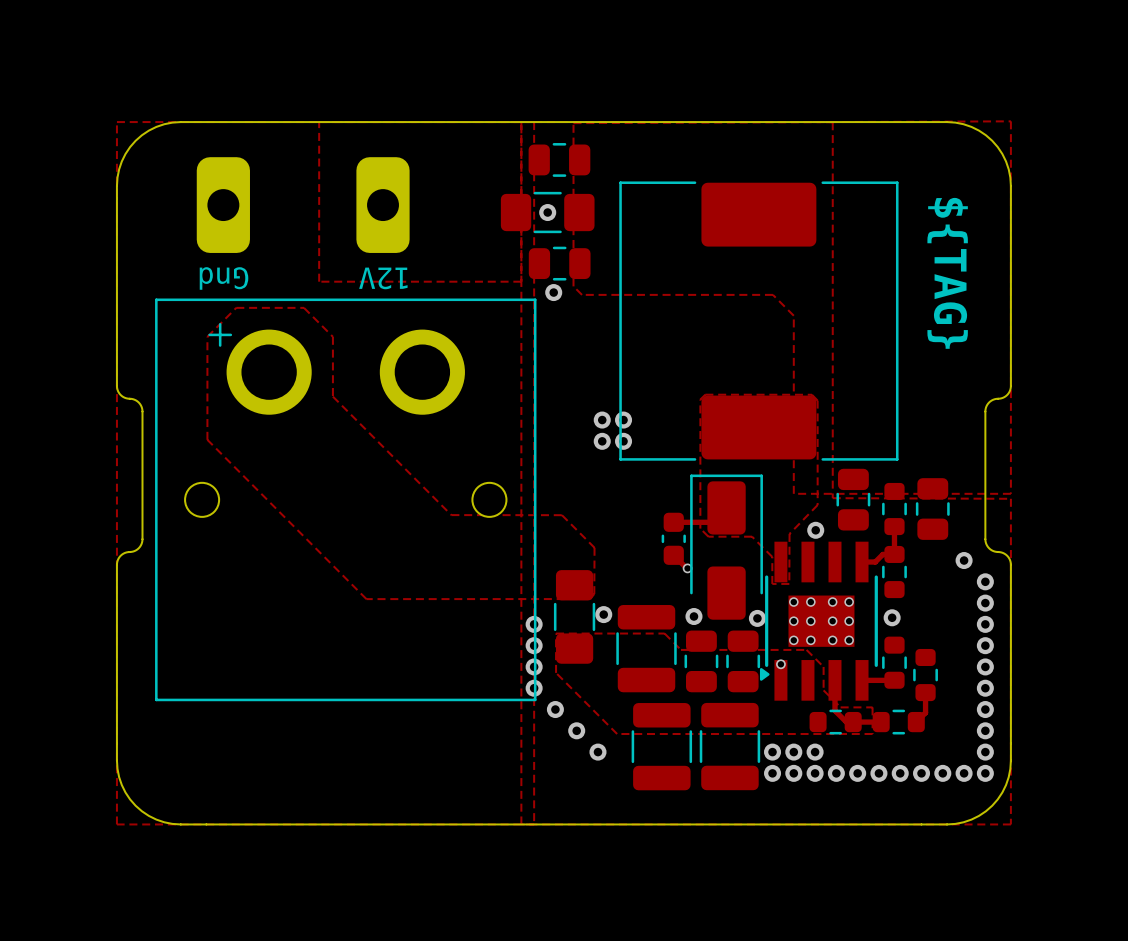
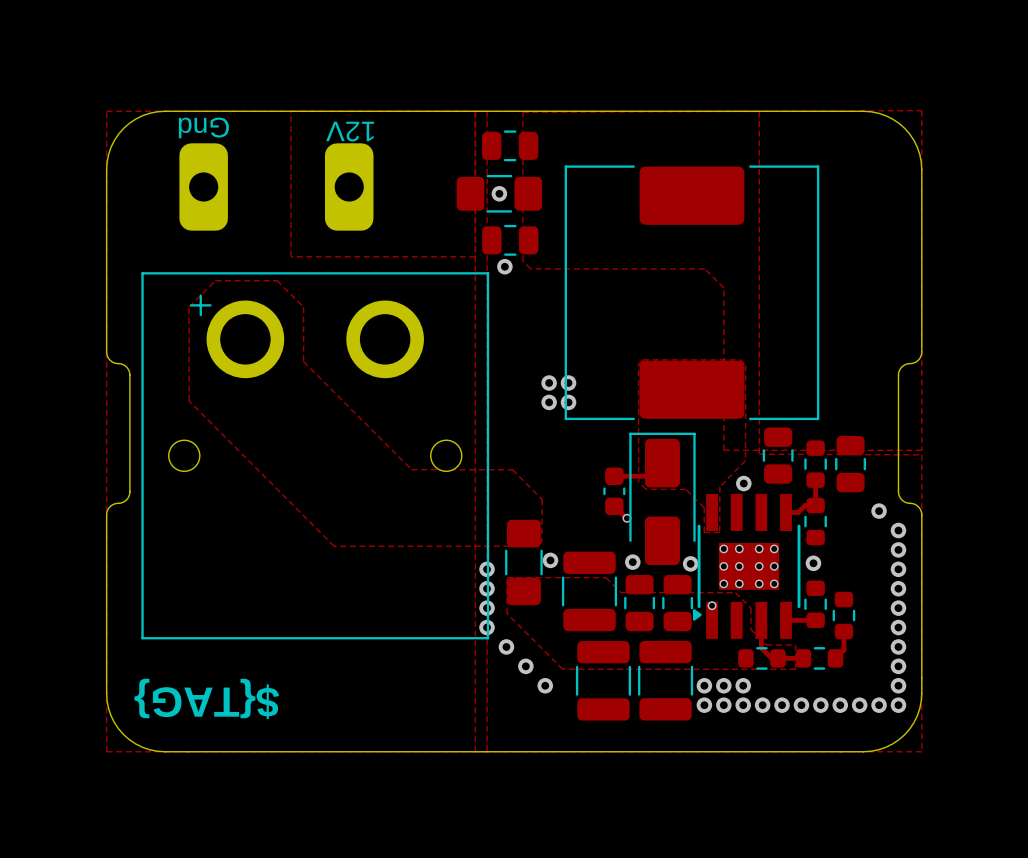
text: ${TAG} (947, 273) -> none
text position: Gnd (224, 278) -> Gnd (203, 127)
text position: 12V (383, 278) -> 12V (350, 131)
text: none -> ${TAG} (206, 698)

